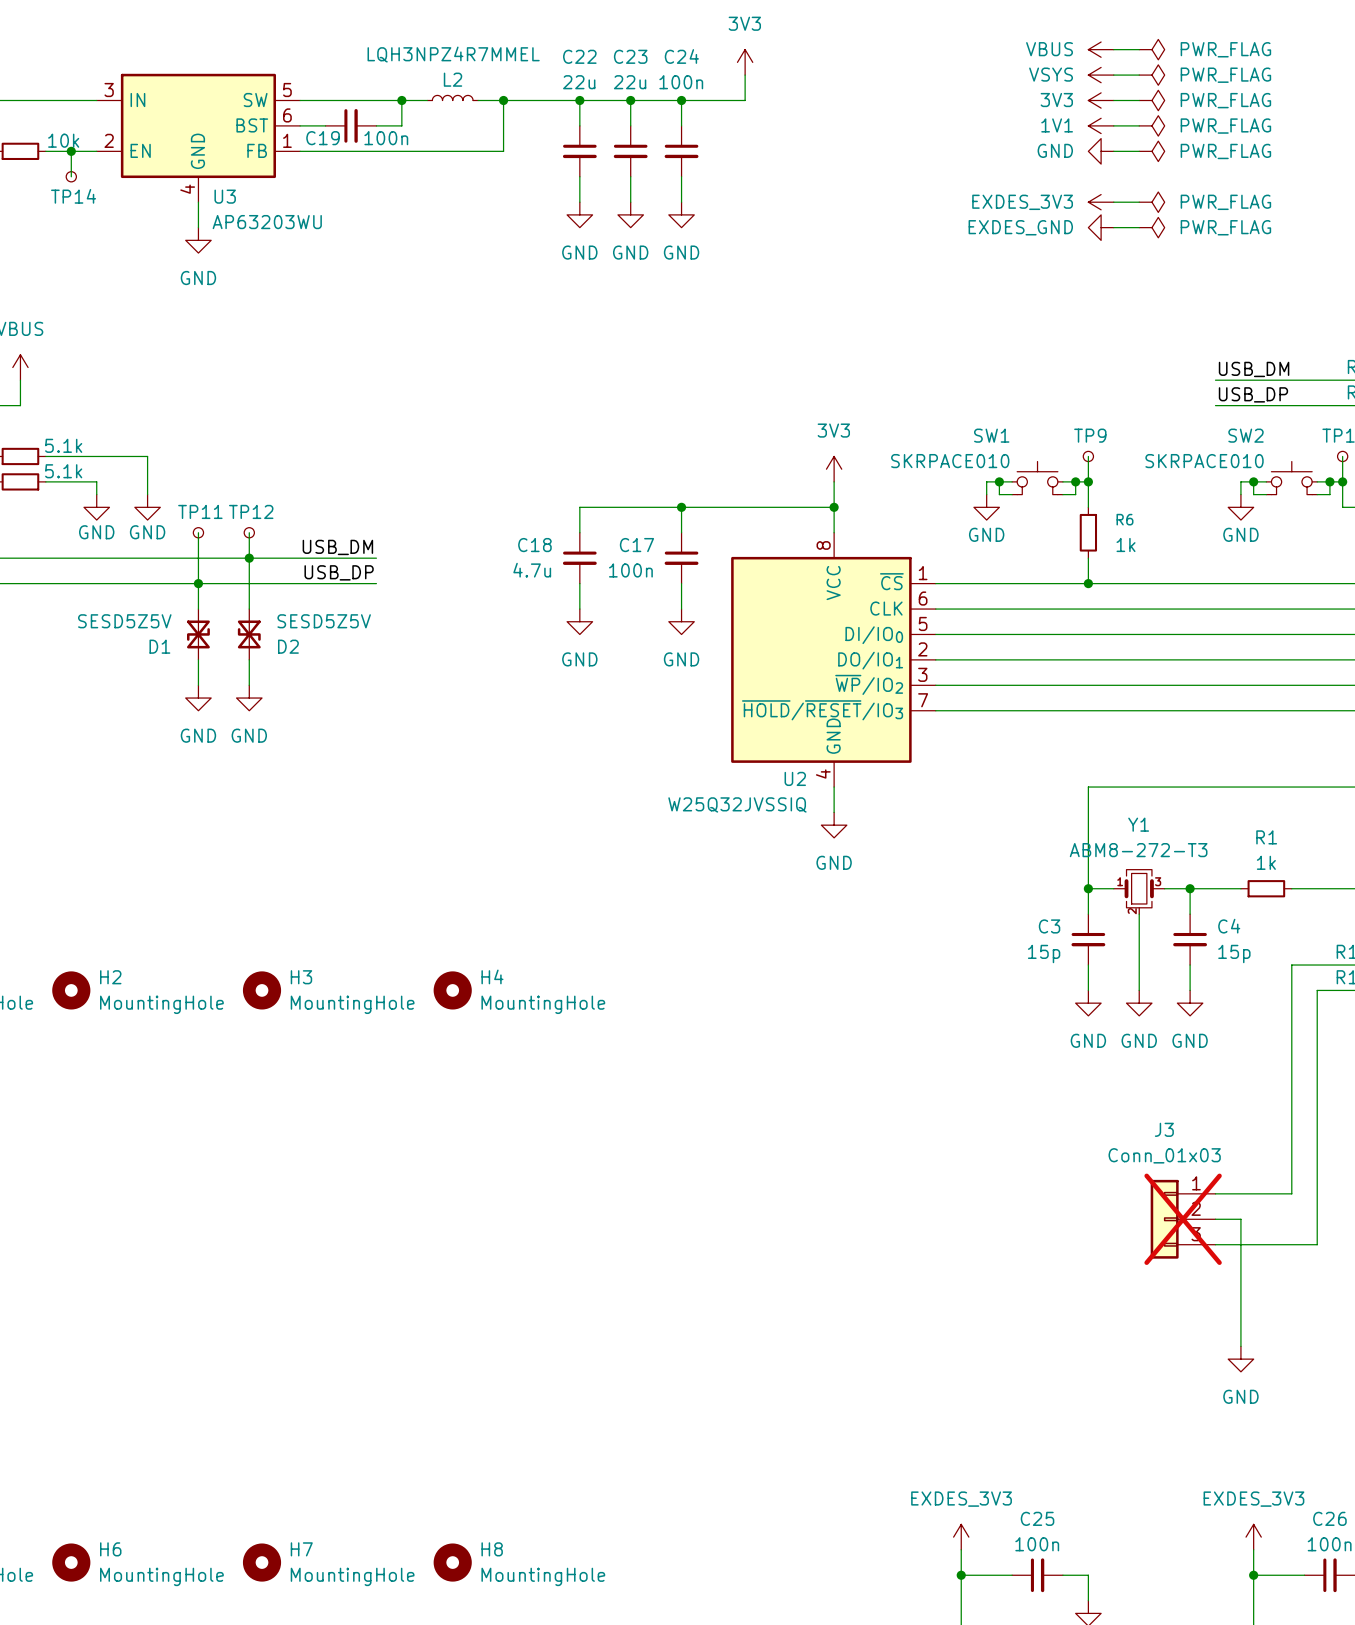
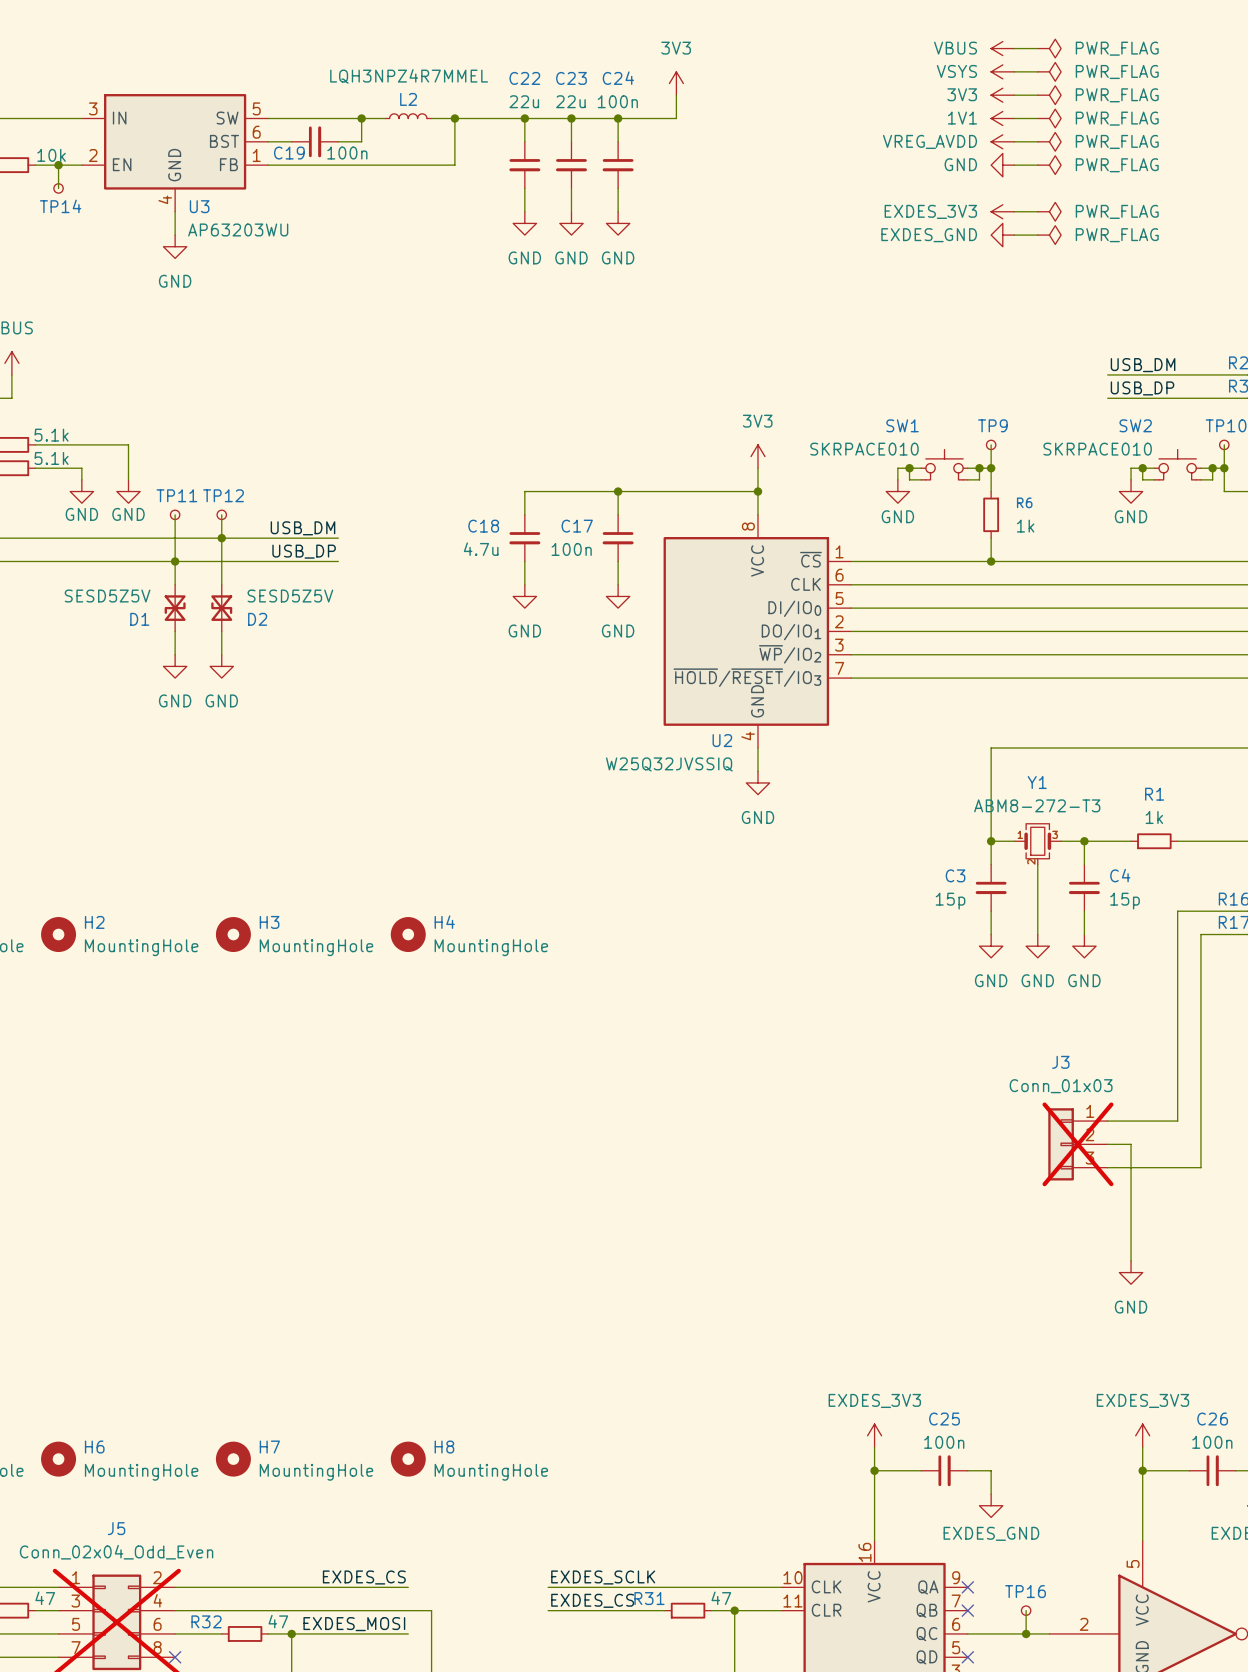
power symbol: none -> VBUS (1002, 48)
wire: none -> (1014, 48) (1037, 48)
power symbol: none -> PWR_FLAG (1049, 48)
power symbol: VBUS (1101, 49) -> VSYS (1002, 71)
power symbol: VSYS (1101, 75) -> 3V3 (1002, 95)
power symbol: 3V3 (1101, 100) -> 1V1 (1002, 118)
power symbol: 1V1 (1101, 125) -> VREG_AVDD (1002, 141)

